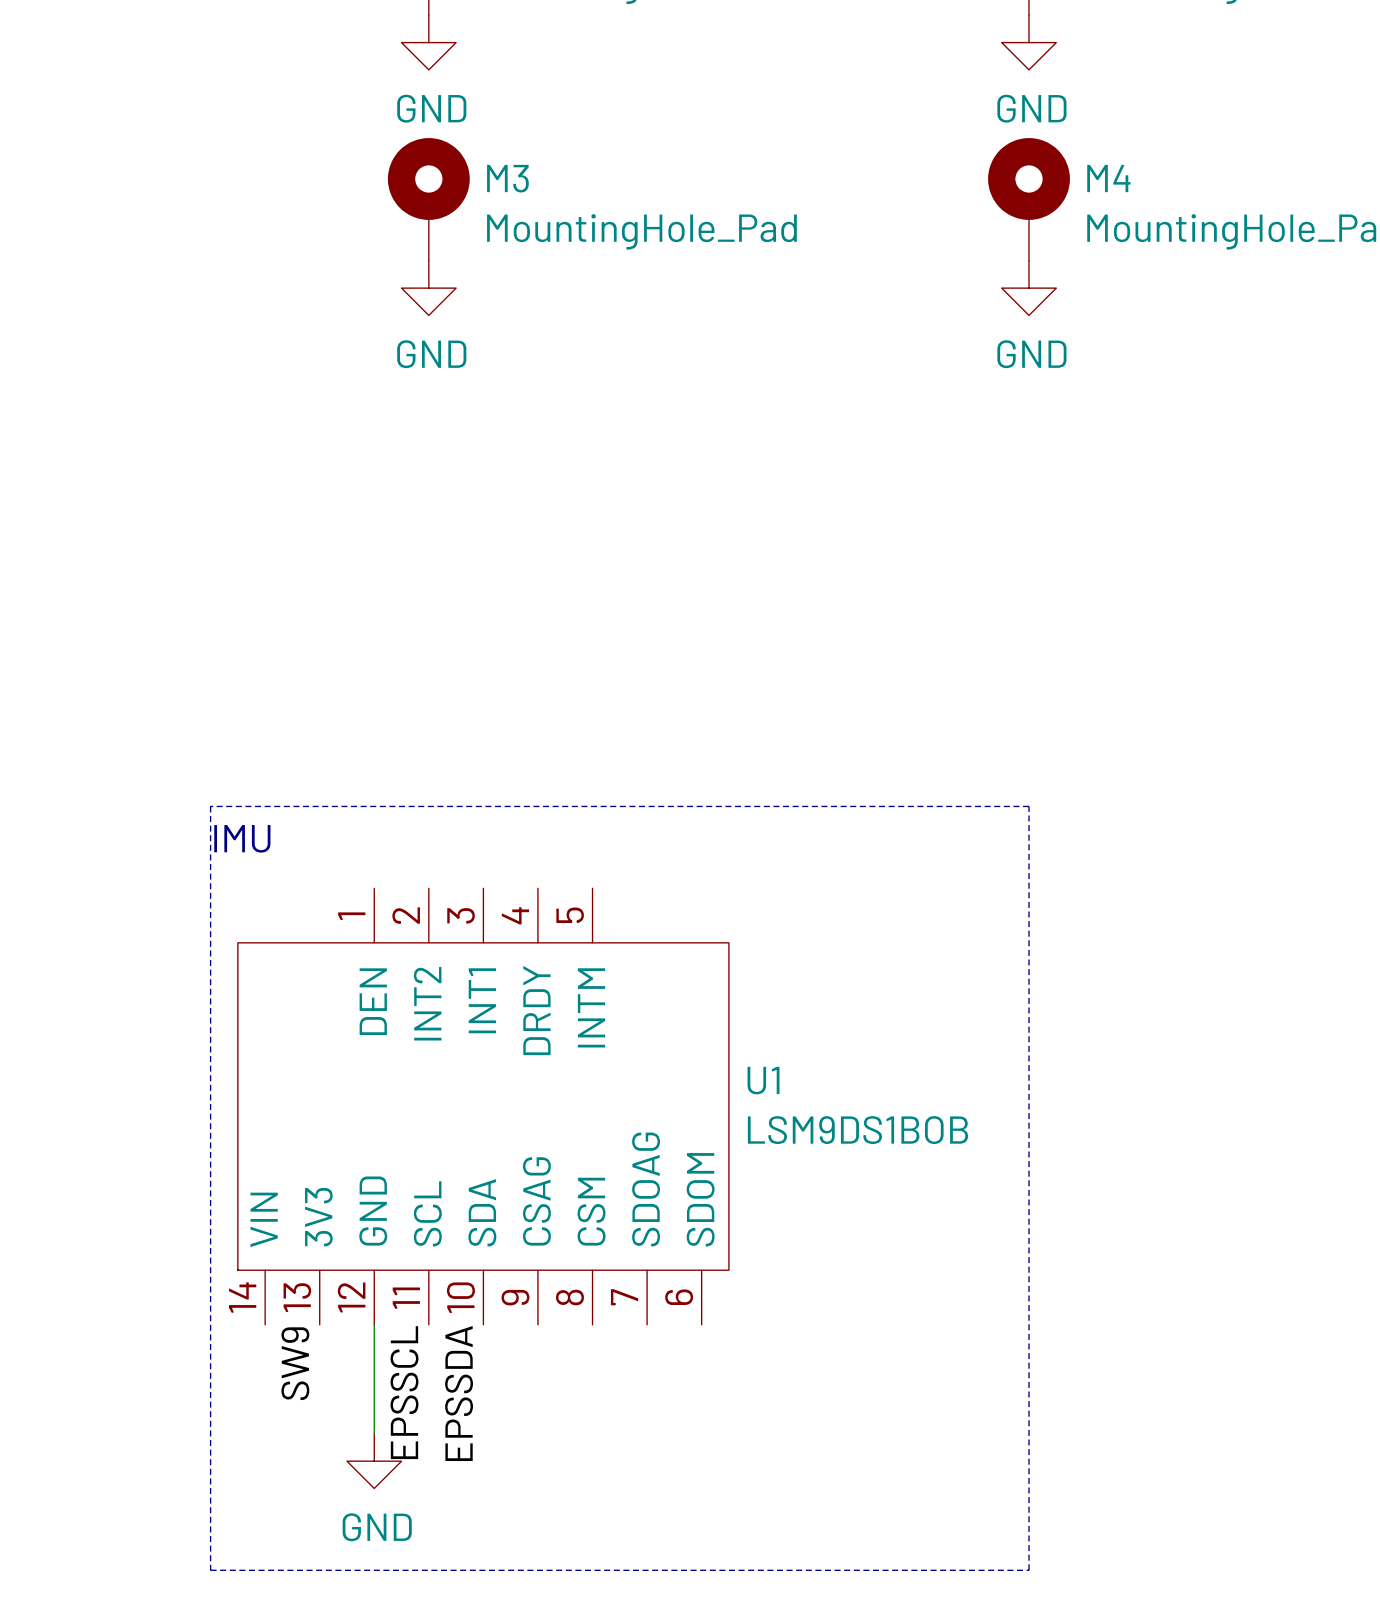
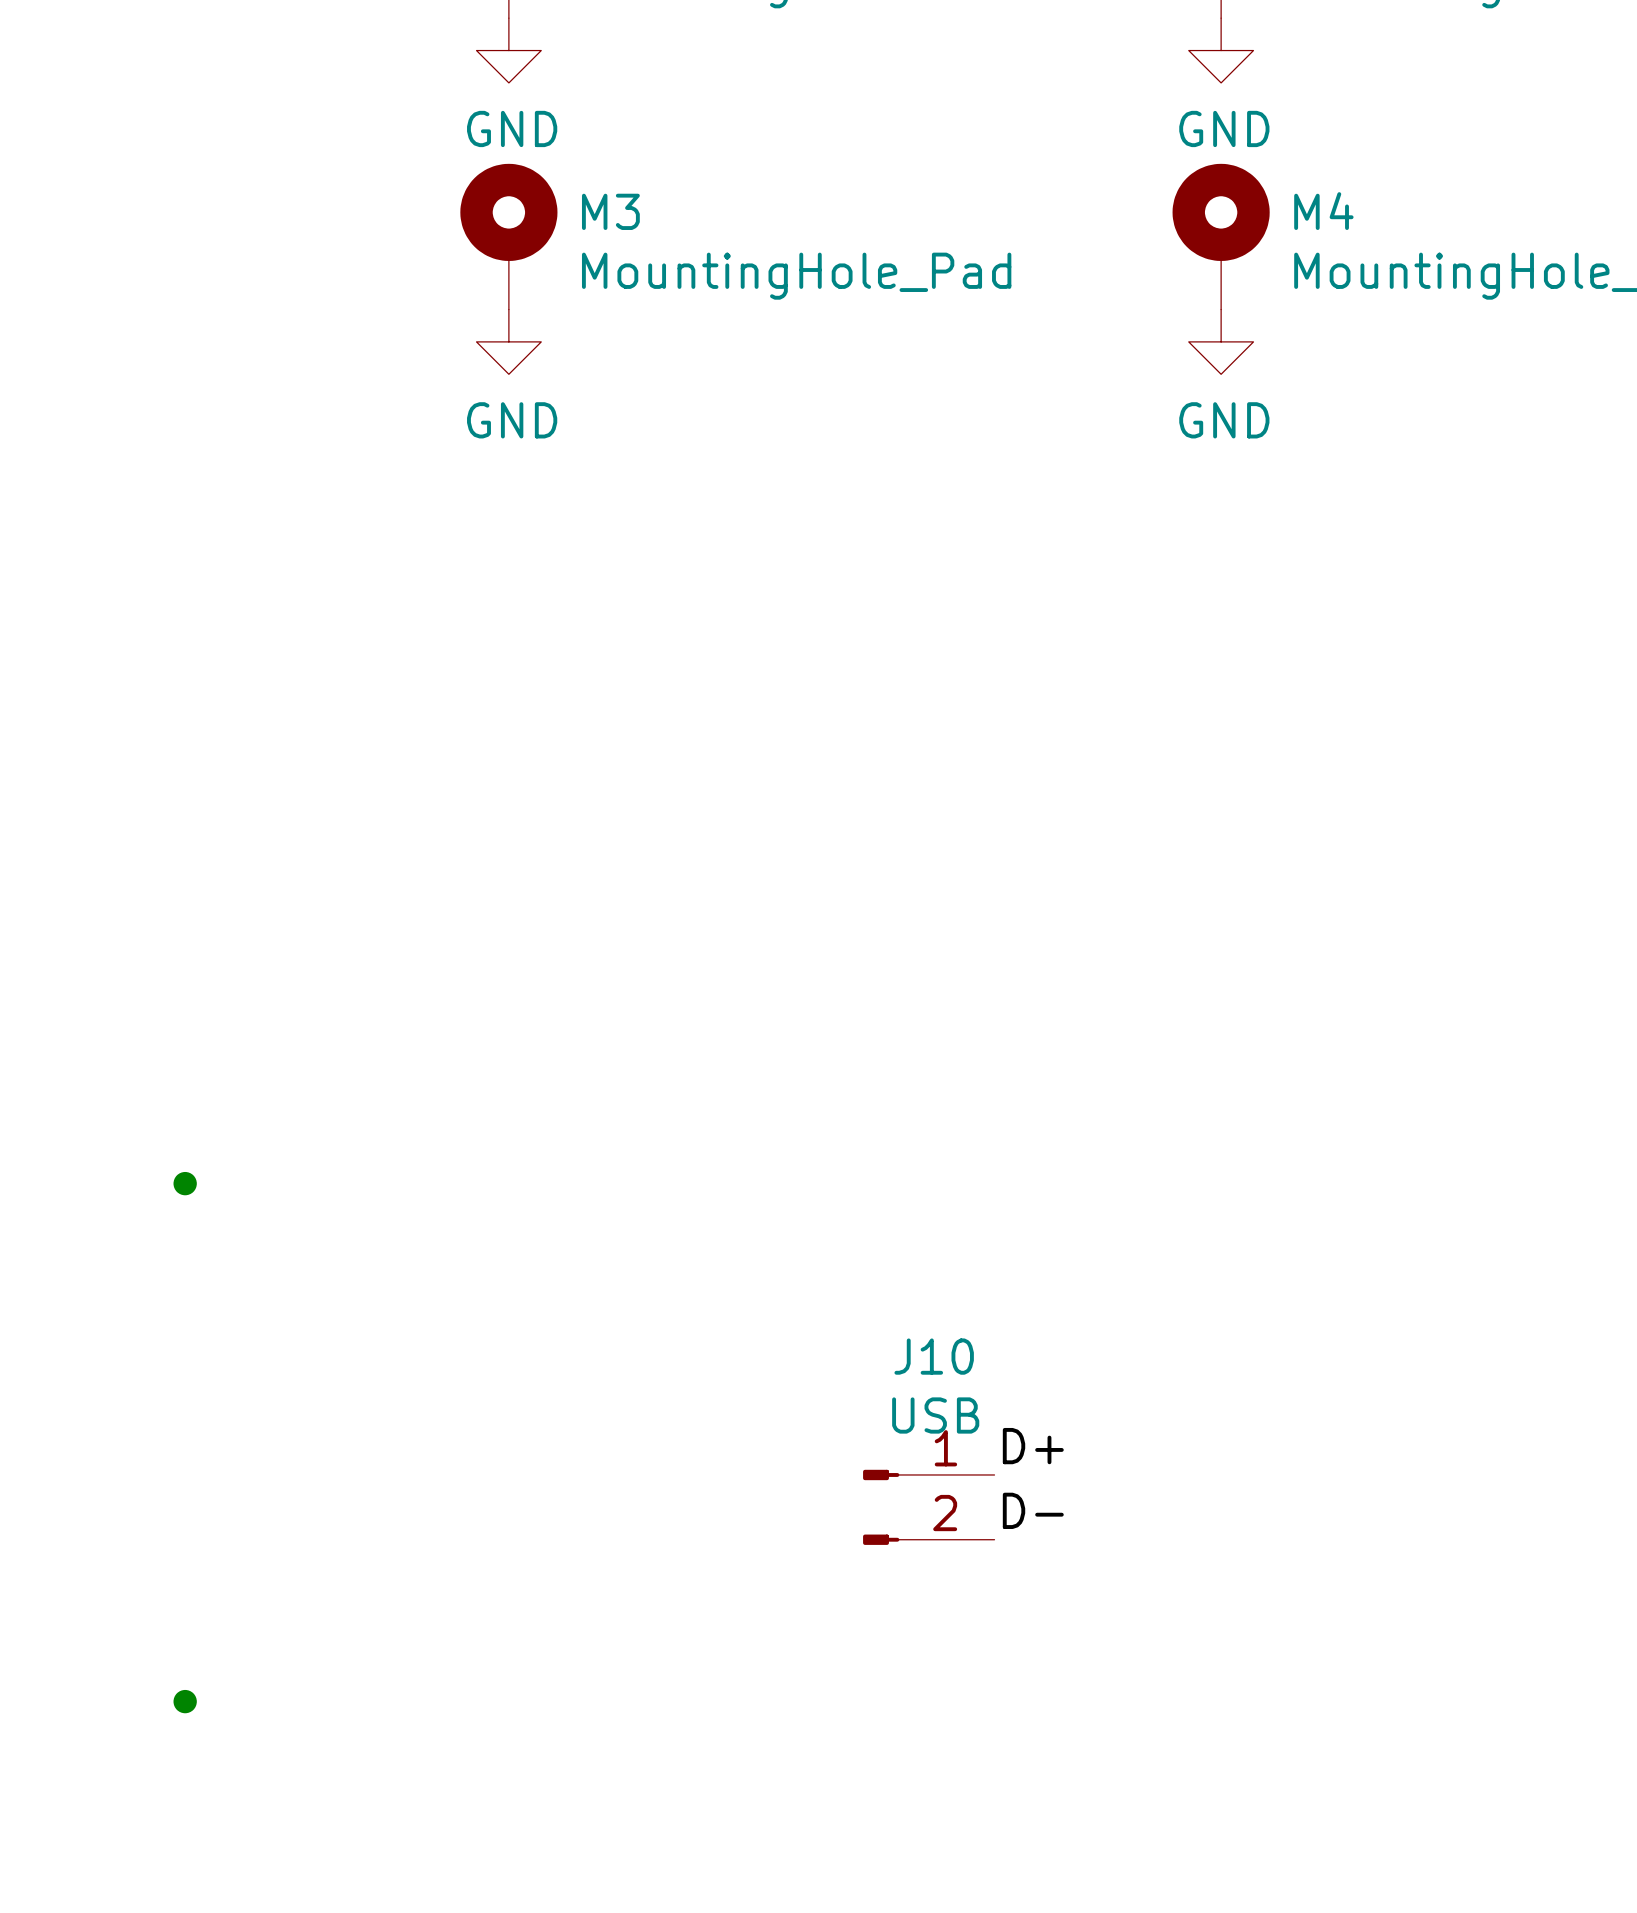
line: (210, 806) (210, 1570) (1029, 1570) (1029, 806) (210, 806) -> none
text: IMU (242, 838) -> none
junction: none -> (185, 1183)
U1: LSM9DS1BOB (483, 1106) -> none
label: none -> D+ (1033, 1446)
J10: none -> USB (928, 1507)
label: none -> D- (1033, 1510)
wire: (374, 1324) (374, 1433) -> none
label: SW9 (295, 1363) -> none
label: EPSSCL (404, 1392) -> none
label: EPSSDA (459, 1393) -> none
junction: none -> (185, 1701)
power symbol: GND (374, 1461) -> none

